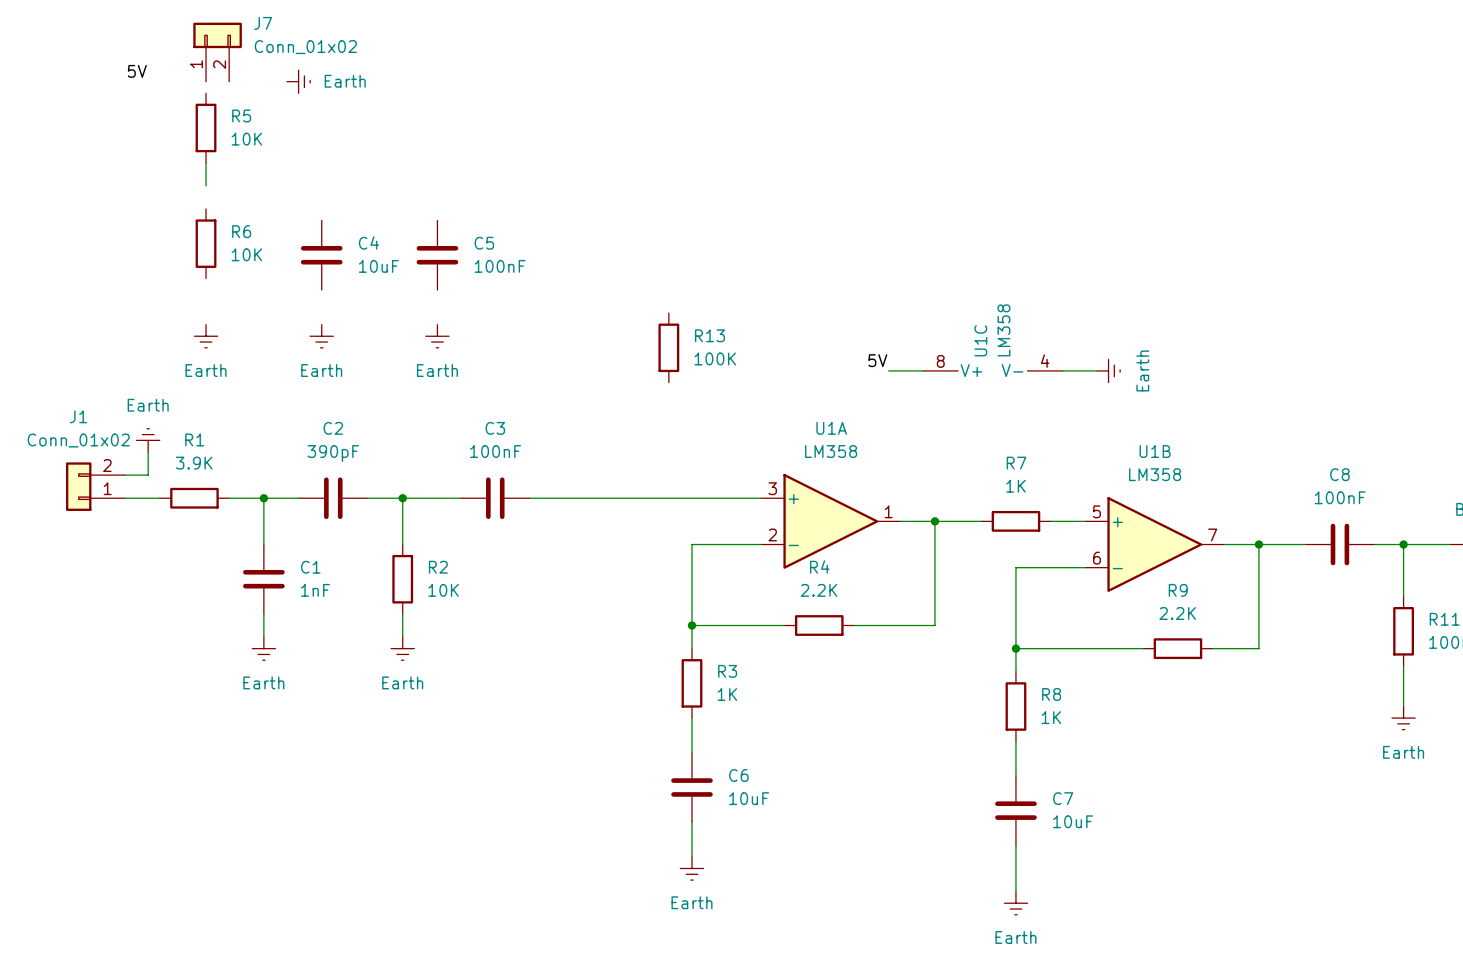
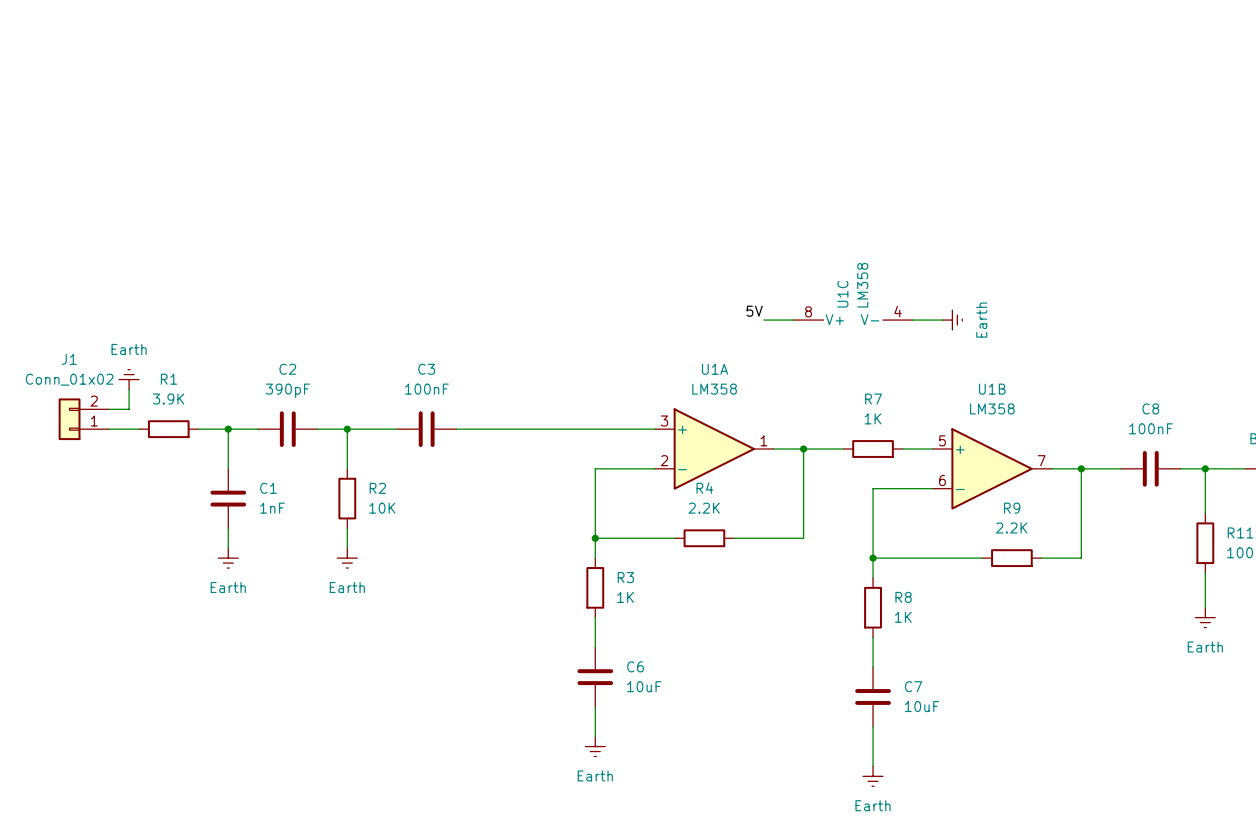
J7: Conn_01x02 (217, 52) -> none
label: 5V (137, 71) -> none
power symbol: Earth (298, 81) -> none
R5: 10K (206, 127) -> none
wire: (206, 162) (206, 185) -> none
R6: 10K (206, 243) -> none
C4: 10uF (321, 255) -> none
C5: 100nF (437, 255) -> none
power symbol: Earth (206, 336) -> none
power symbol: Earth (321, 336) -> none
power symbol: Earth (437, 336) -> none
R13: 100K (668, 347) -> none

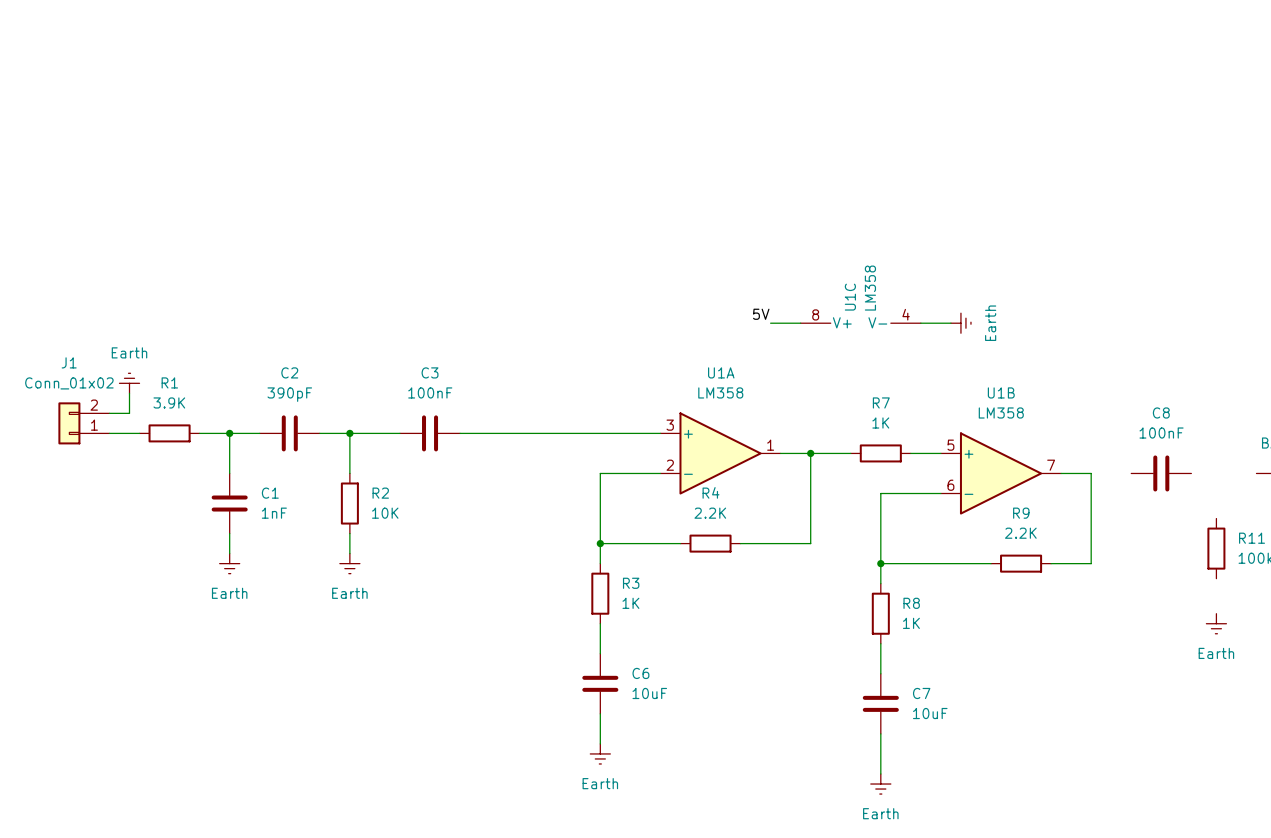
wire: (1081, 468) (1121, 468) -> none
junction: (1081, 468) -> none
wire: (1180, 468) (1245, 468) -> none
wire: (1205, 468) (1205, 513) -> none
junction: (1205, 468) -> none
wire: (1205, 572) (1205, 607) -> none

